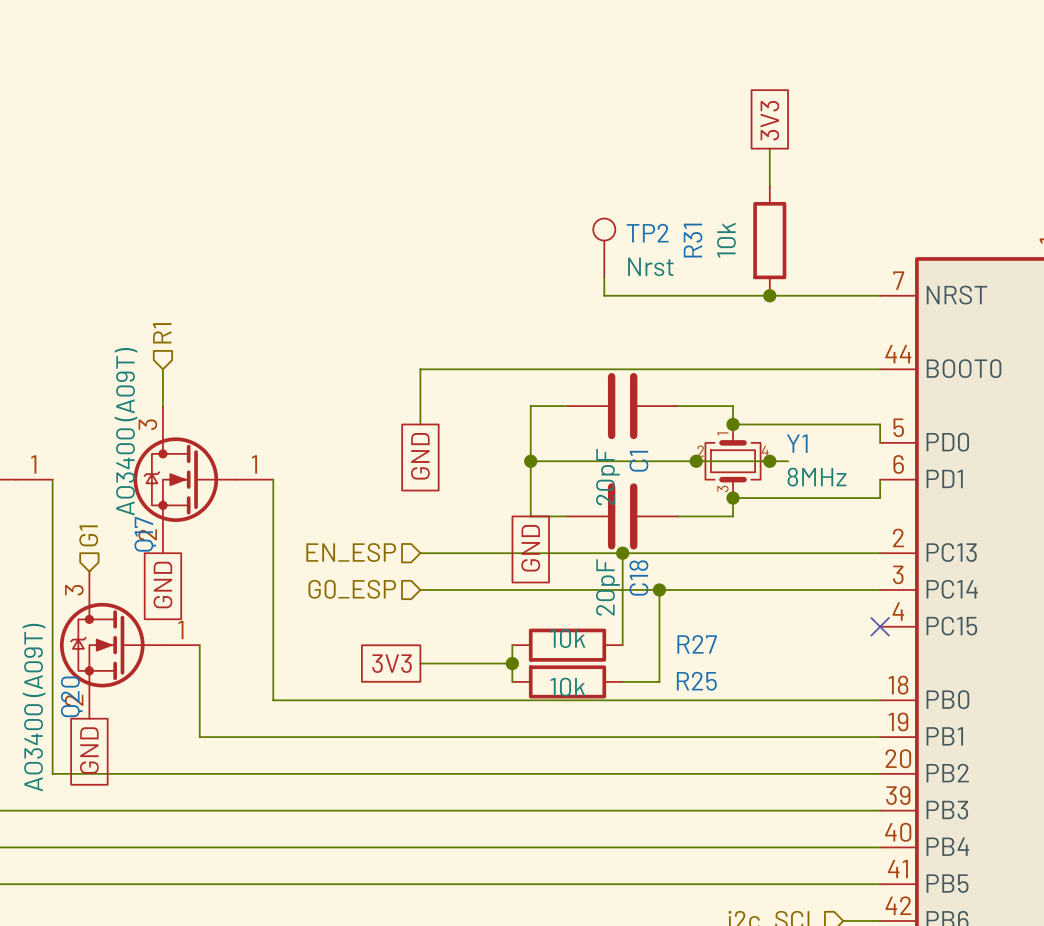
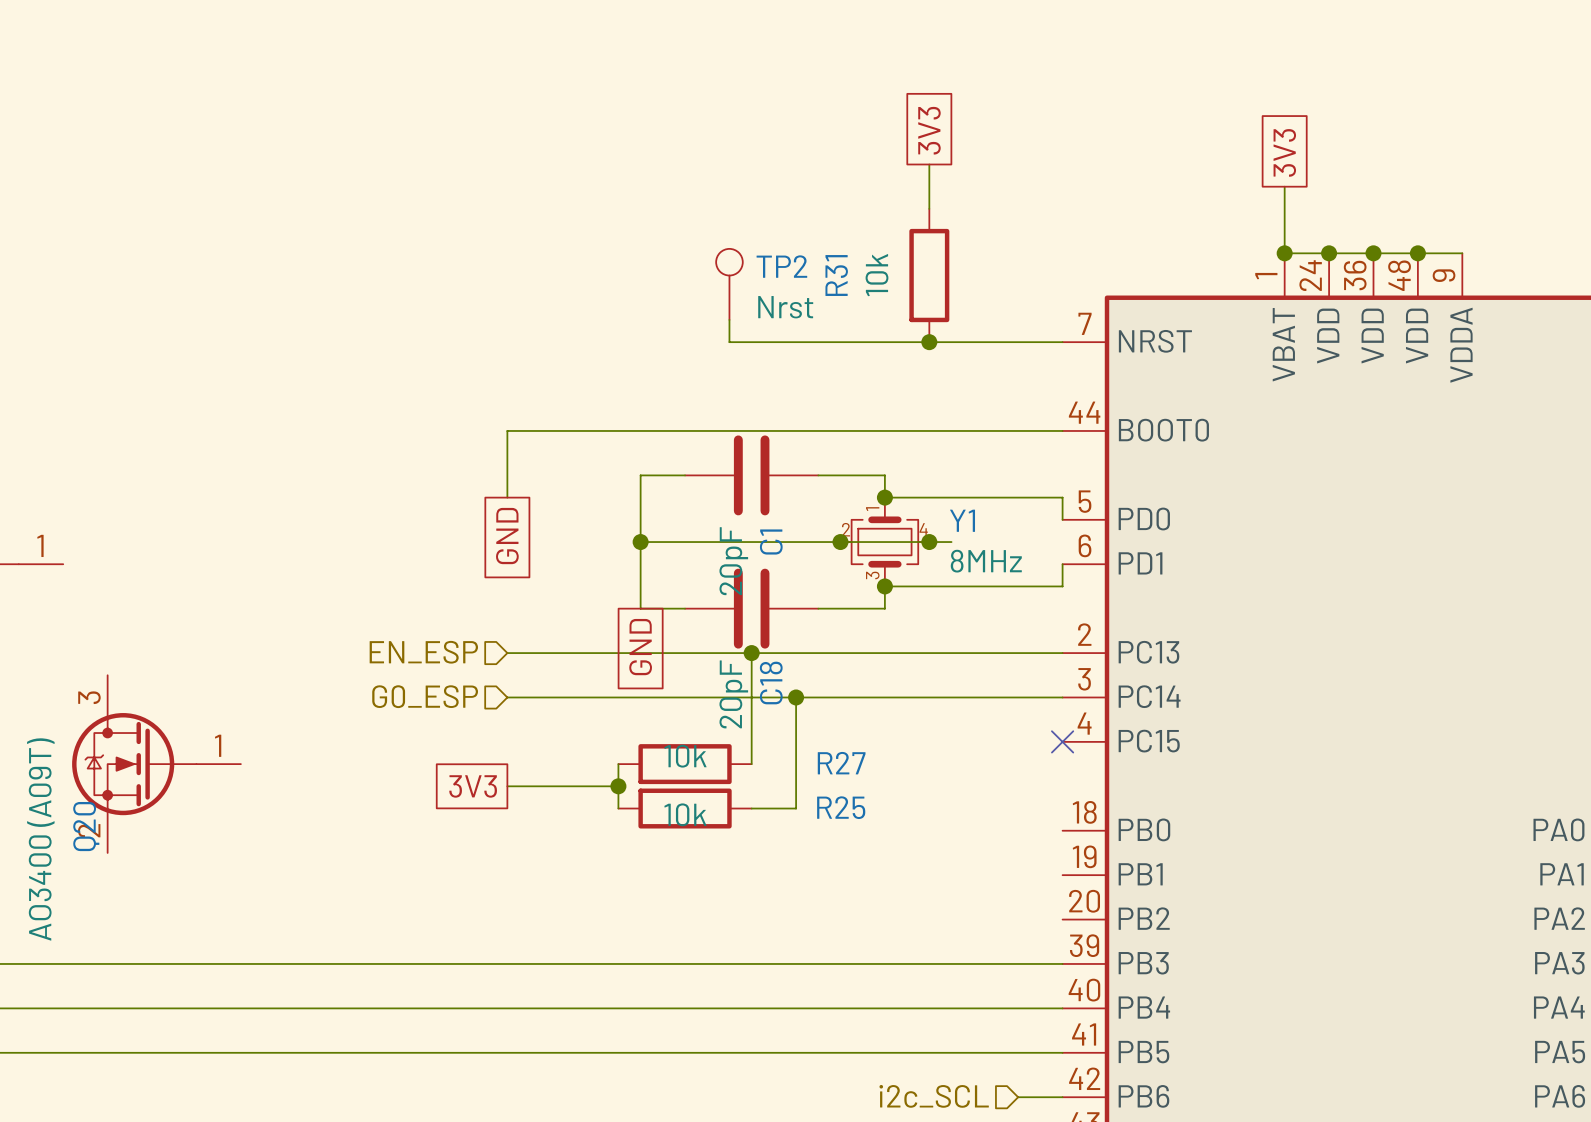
hierarchical label: R1 (162, 333) -> none
wire: (162, 369) (162, 406) -> none
wire: (52, 479) (52, 773) (880, 773) -> none
Q17: AO3400 (A09T) (203, 479) -> none
wire: (273, 479) (273, 700) (880, 700) -> none
hierarchical label: G1 (88, 535) -> none
global label: GND (162, 585) -> none
wire: (199, 645) (199, 737) (880, 737) -> none
global label: GND (89, 750) -> none

